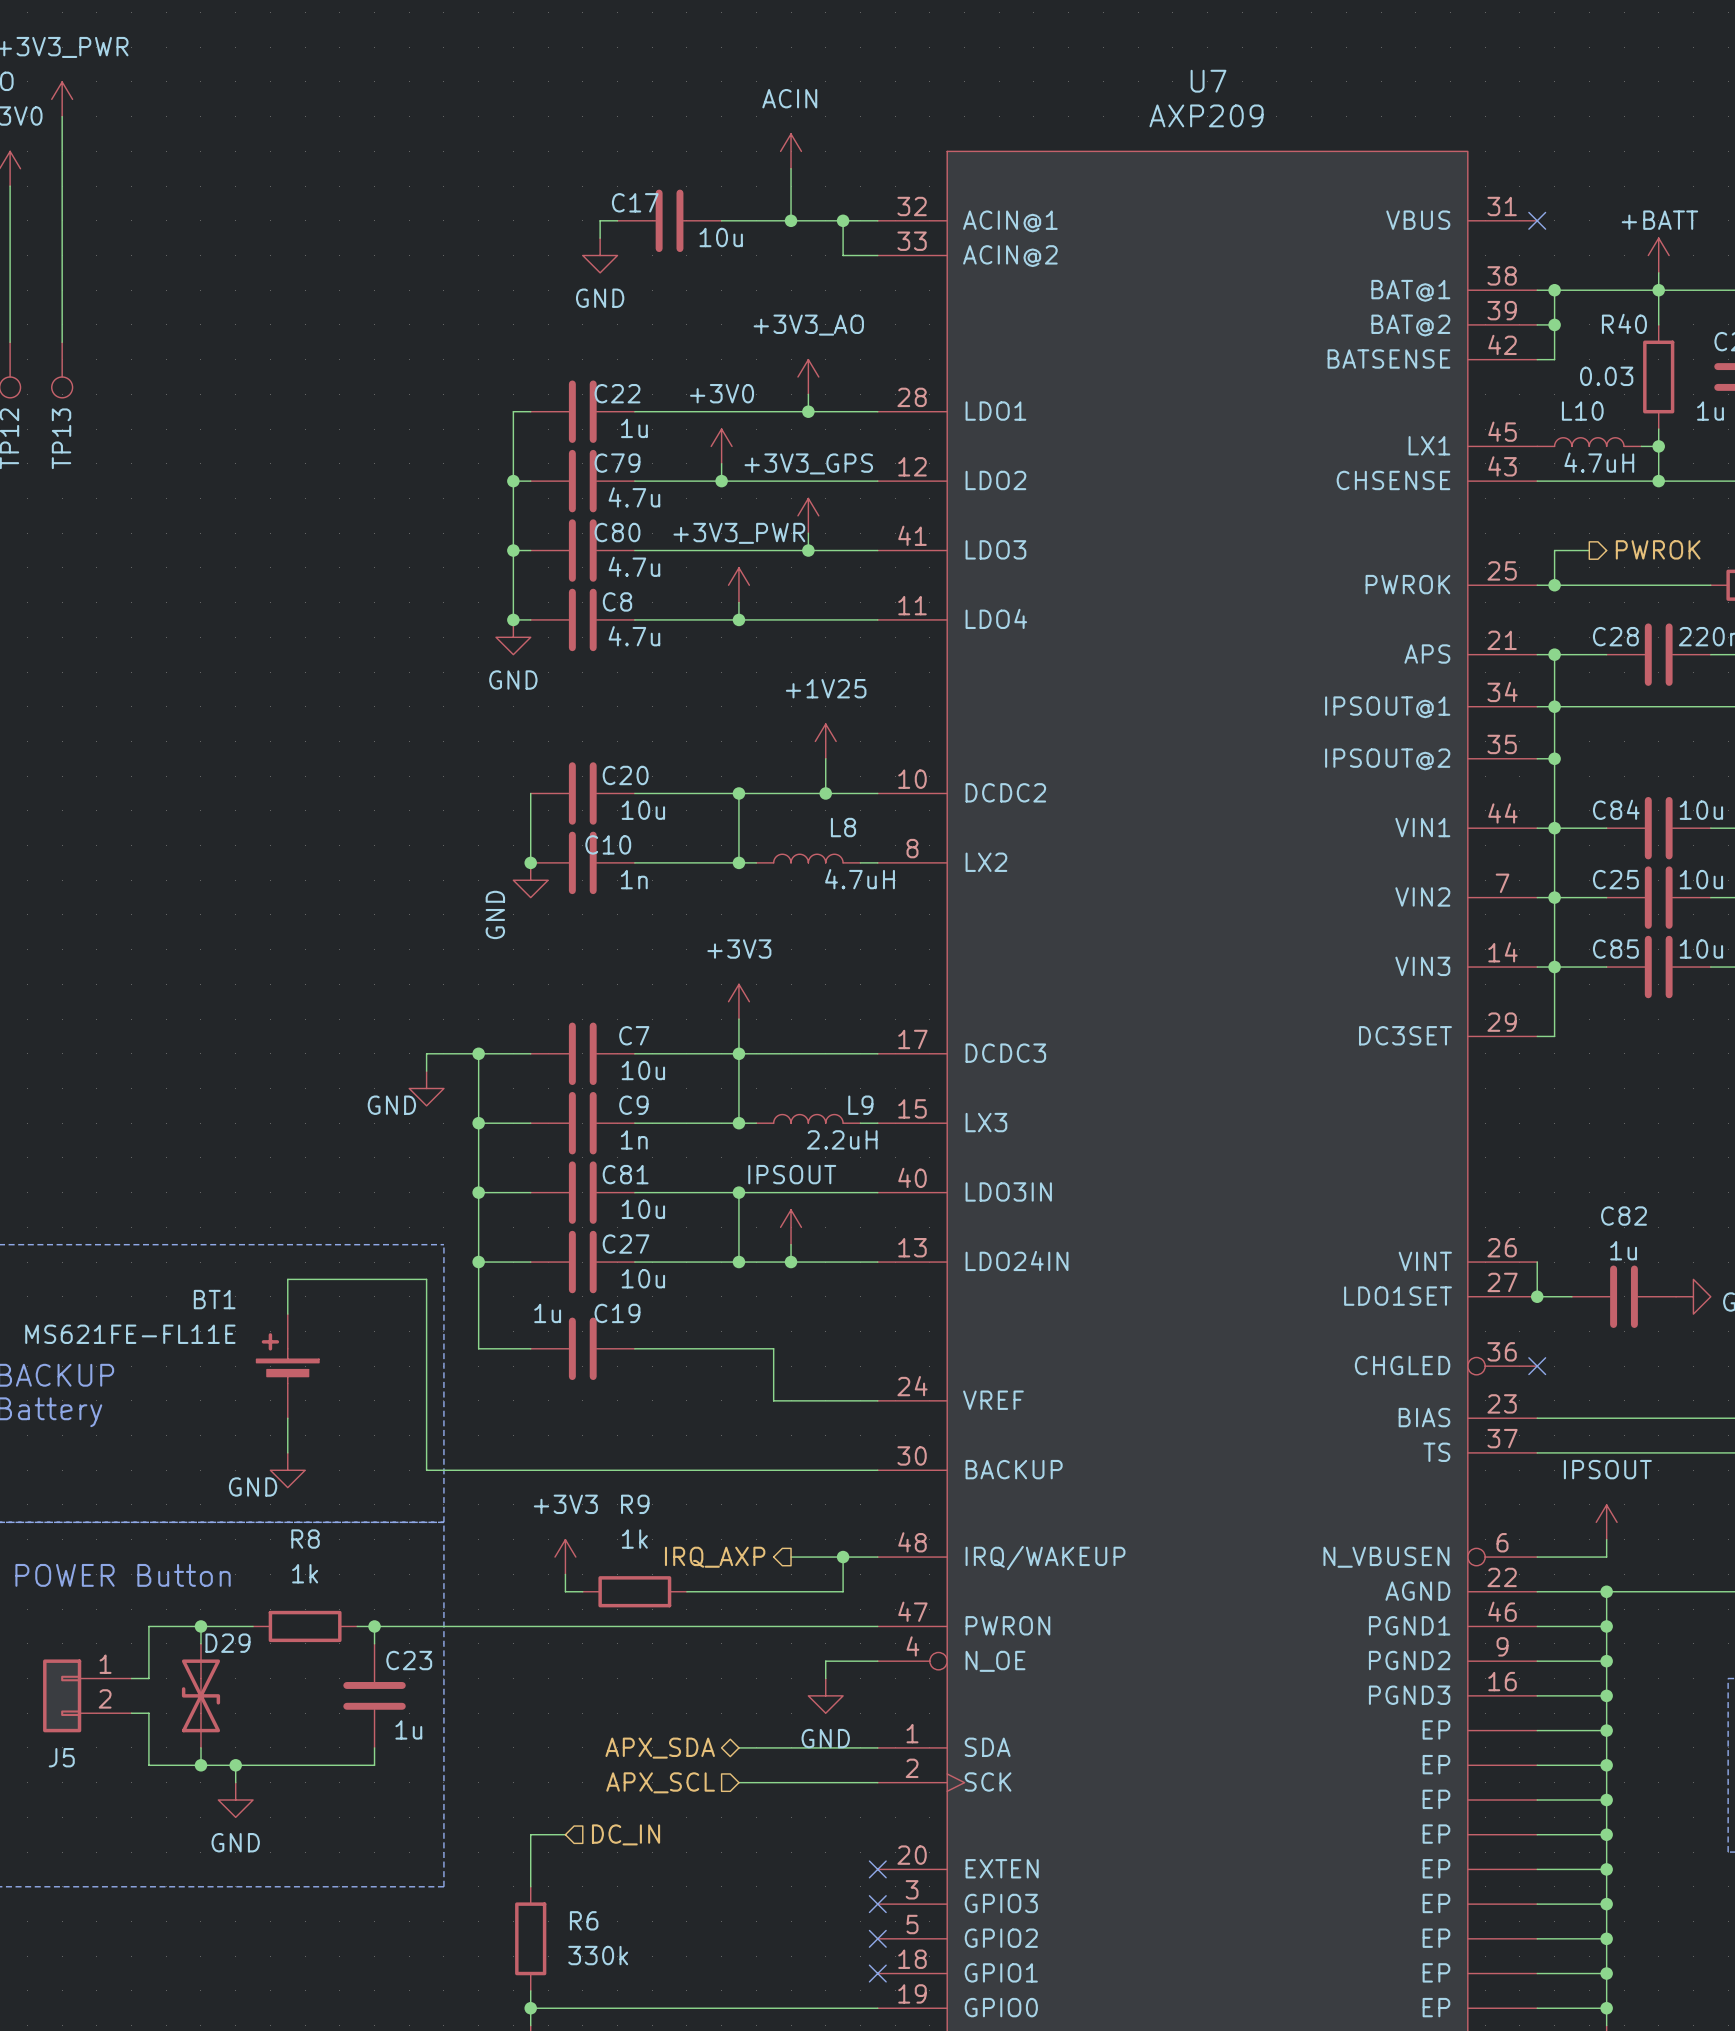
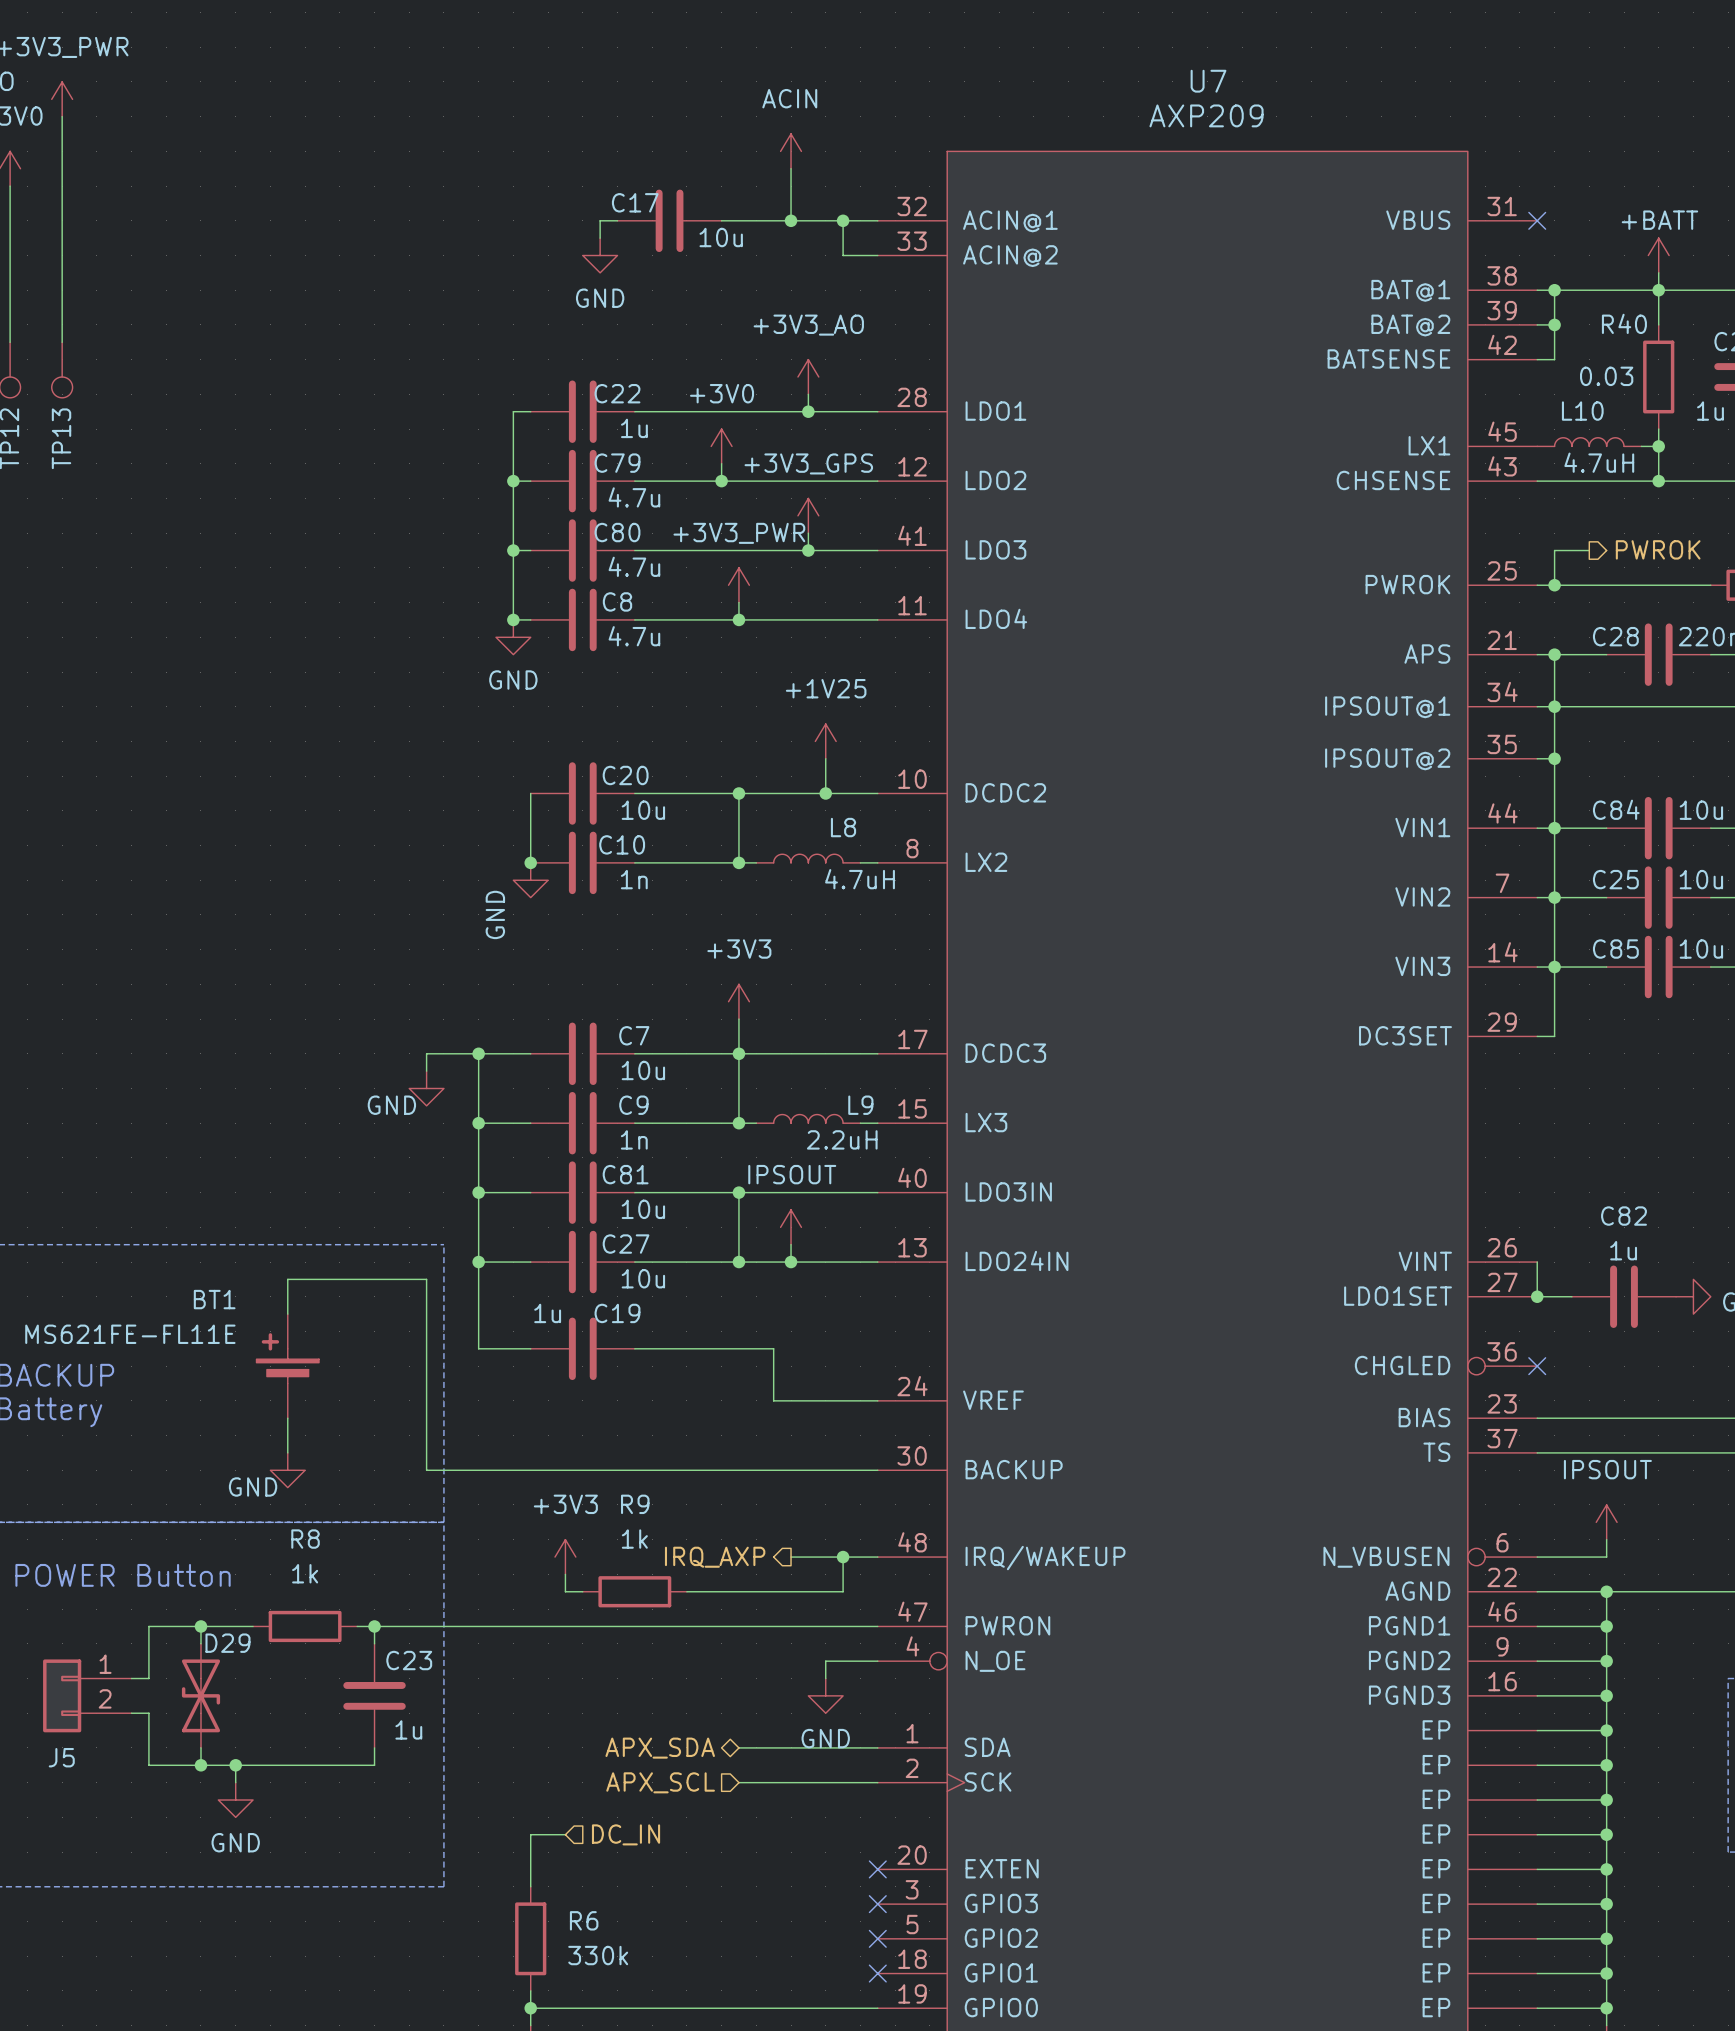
C10 name position: C10 (608, 844) -> C10 (622, 844)

